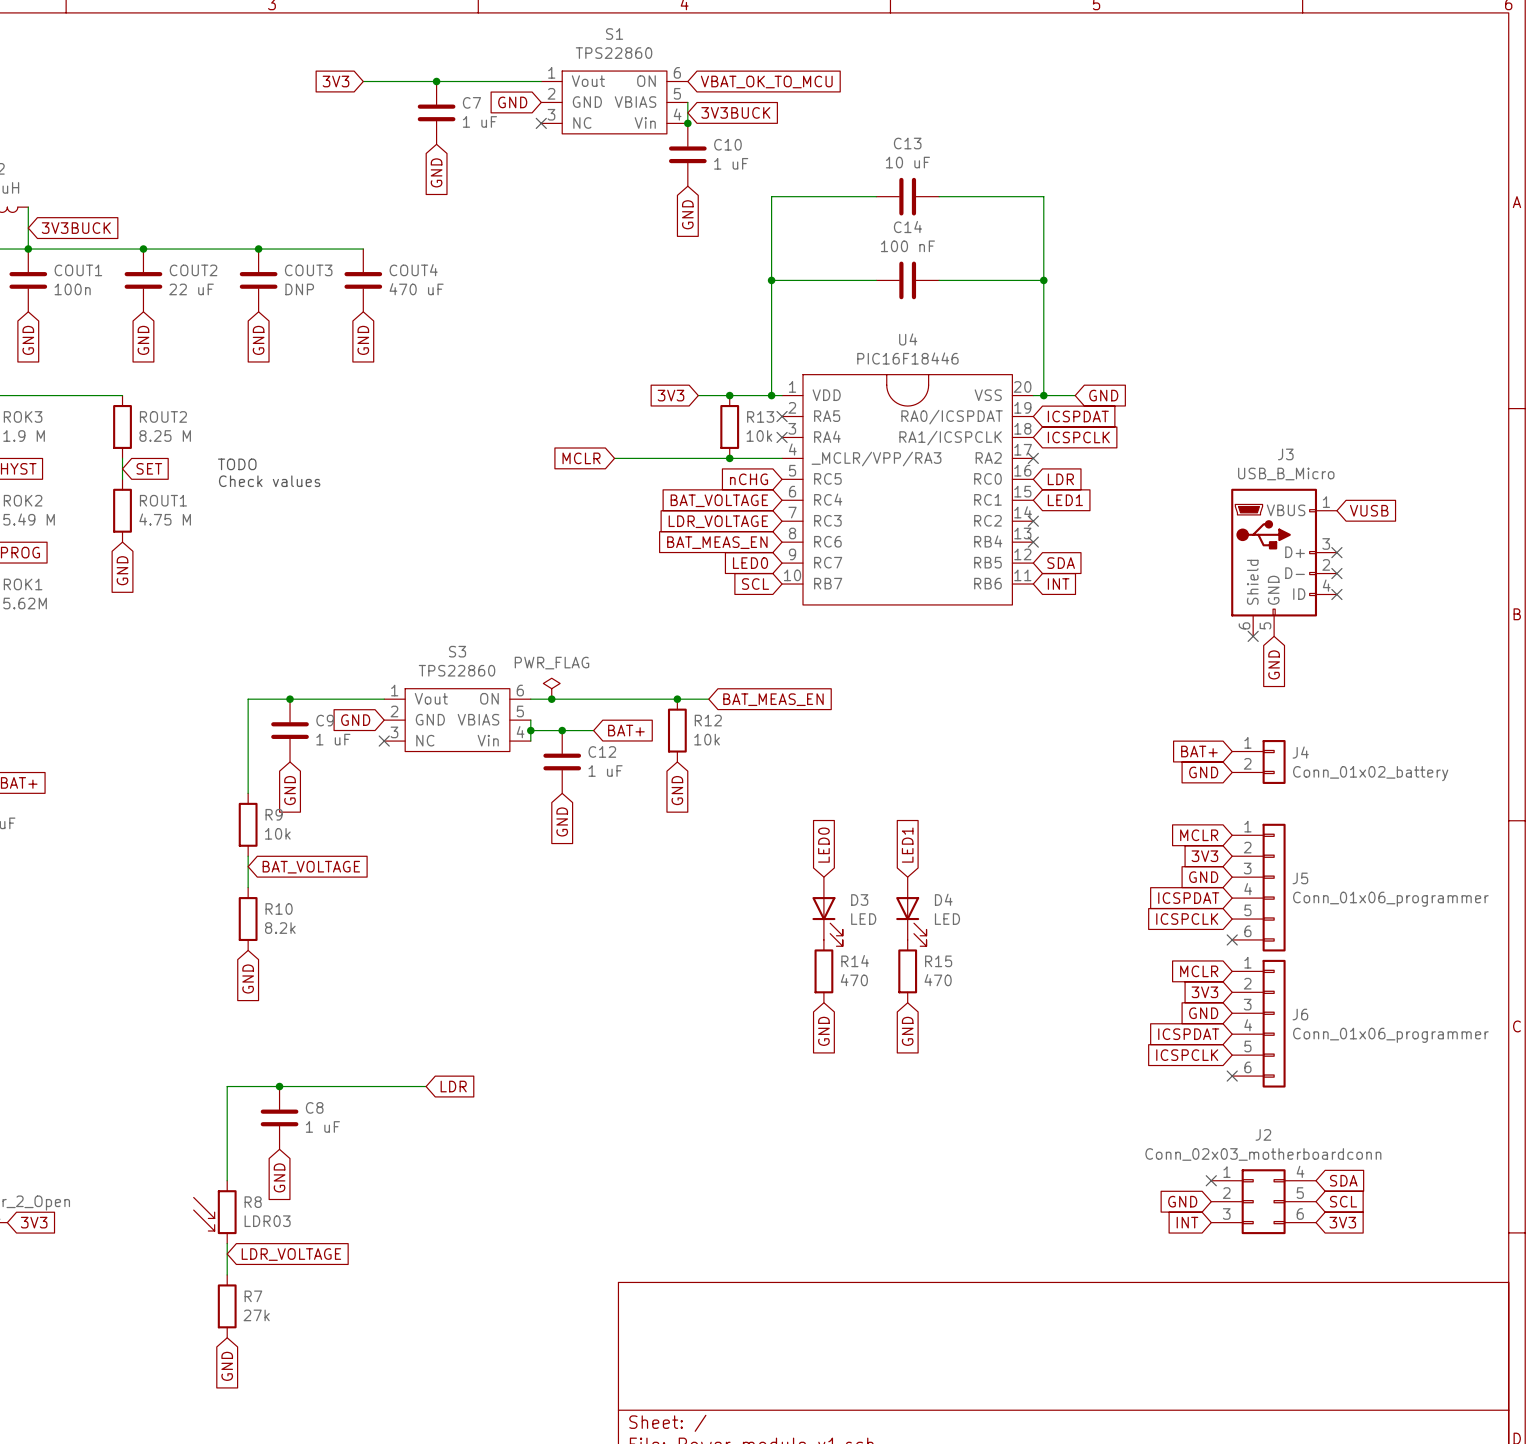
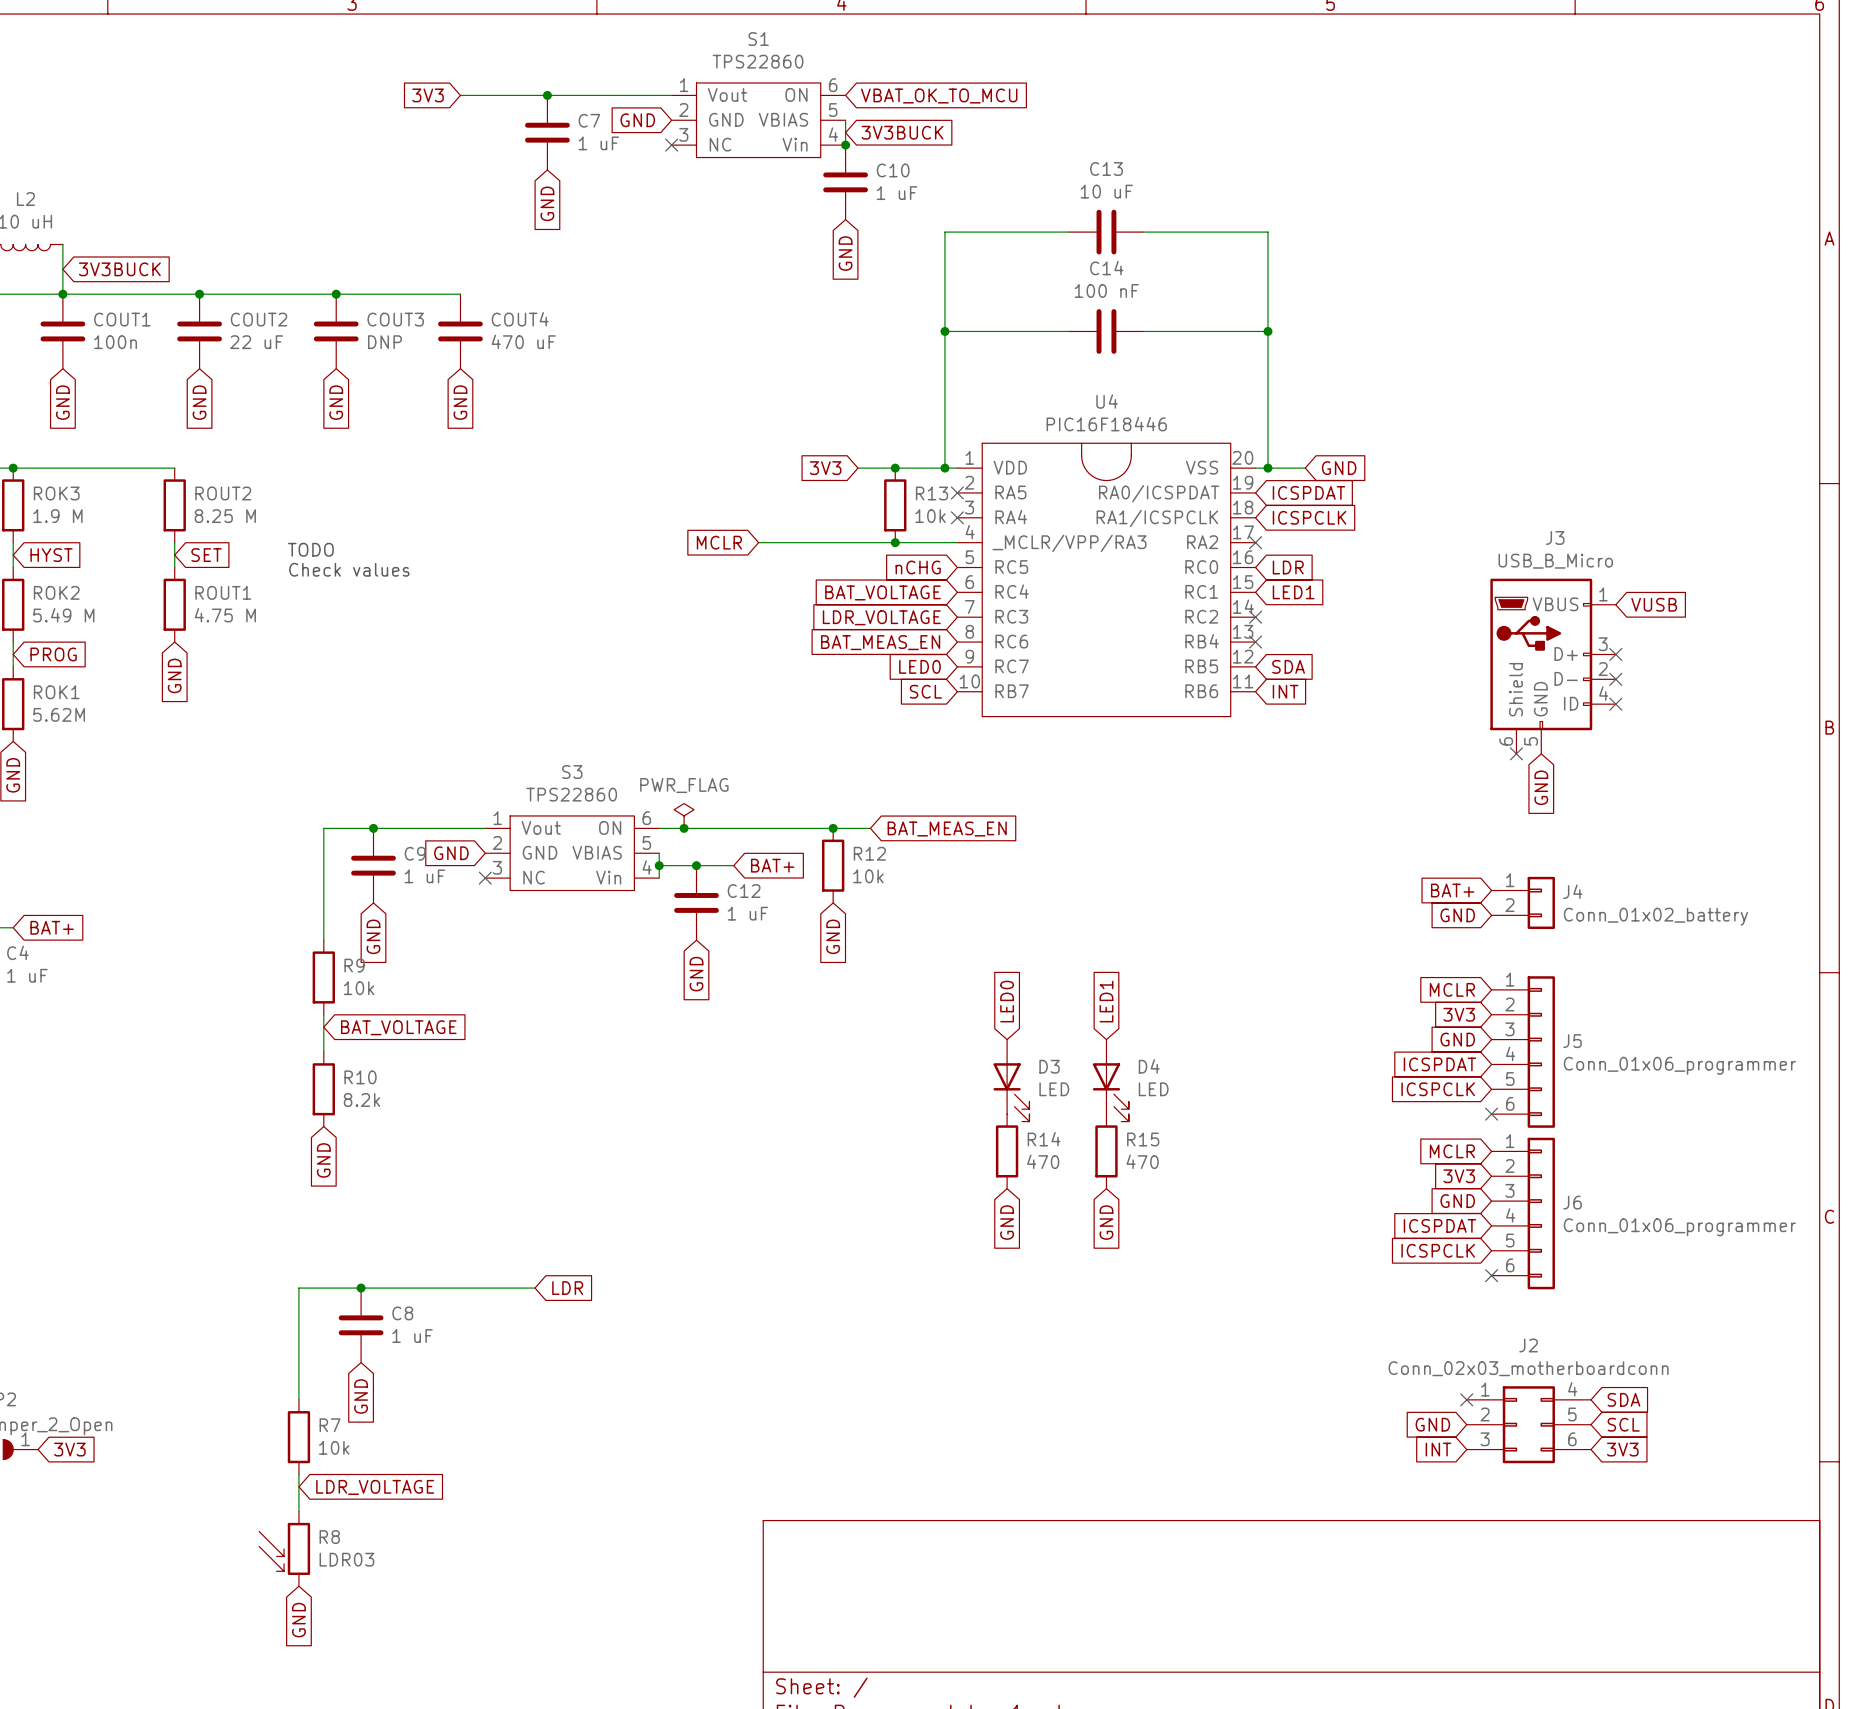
R8 position: (215, 1212) -> (284, 1548)
R7 position: (227, 1306) -> (298, 1437)
R7 value: 27k (256, 1315) -> 10k (334, 1447)

